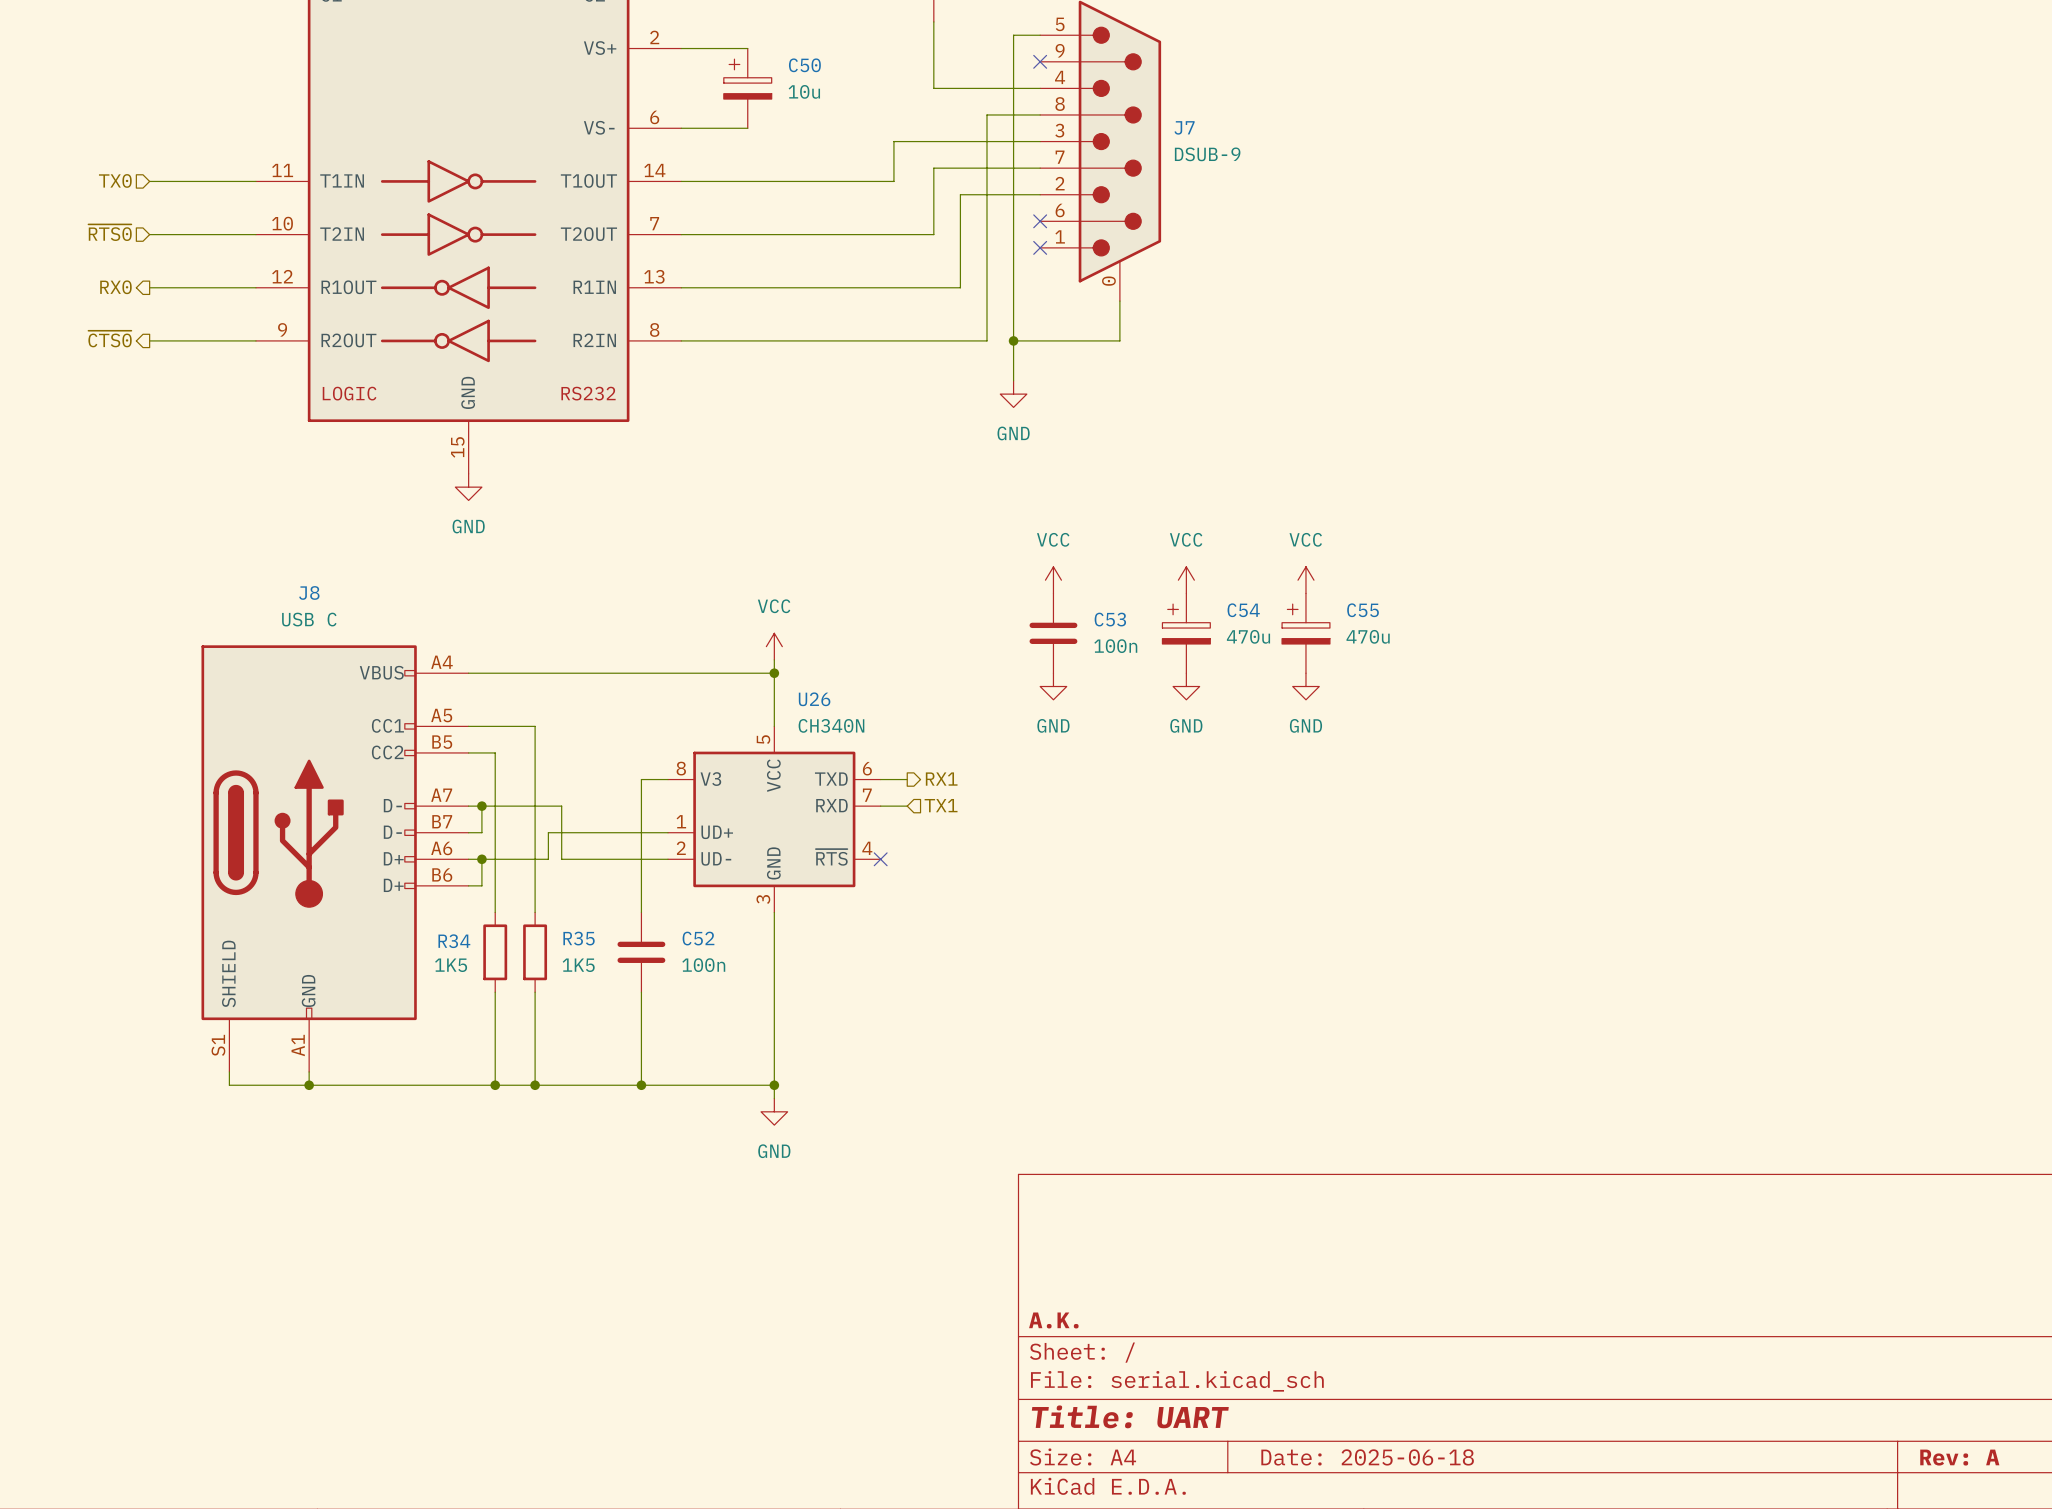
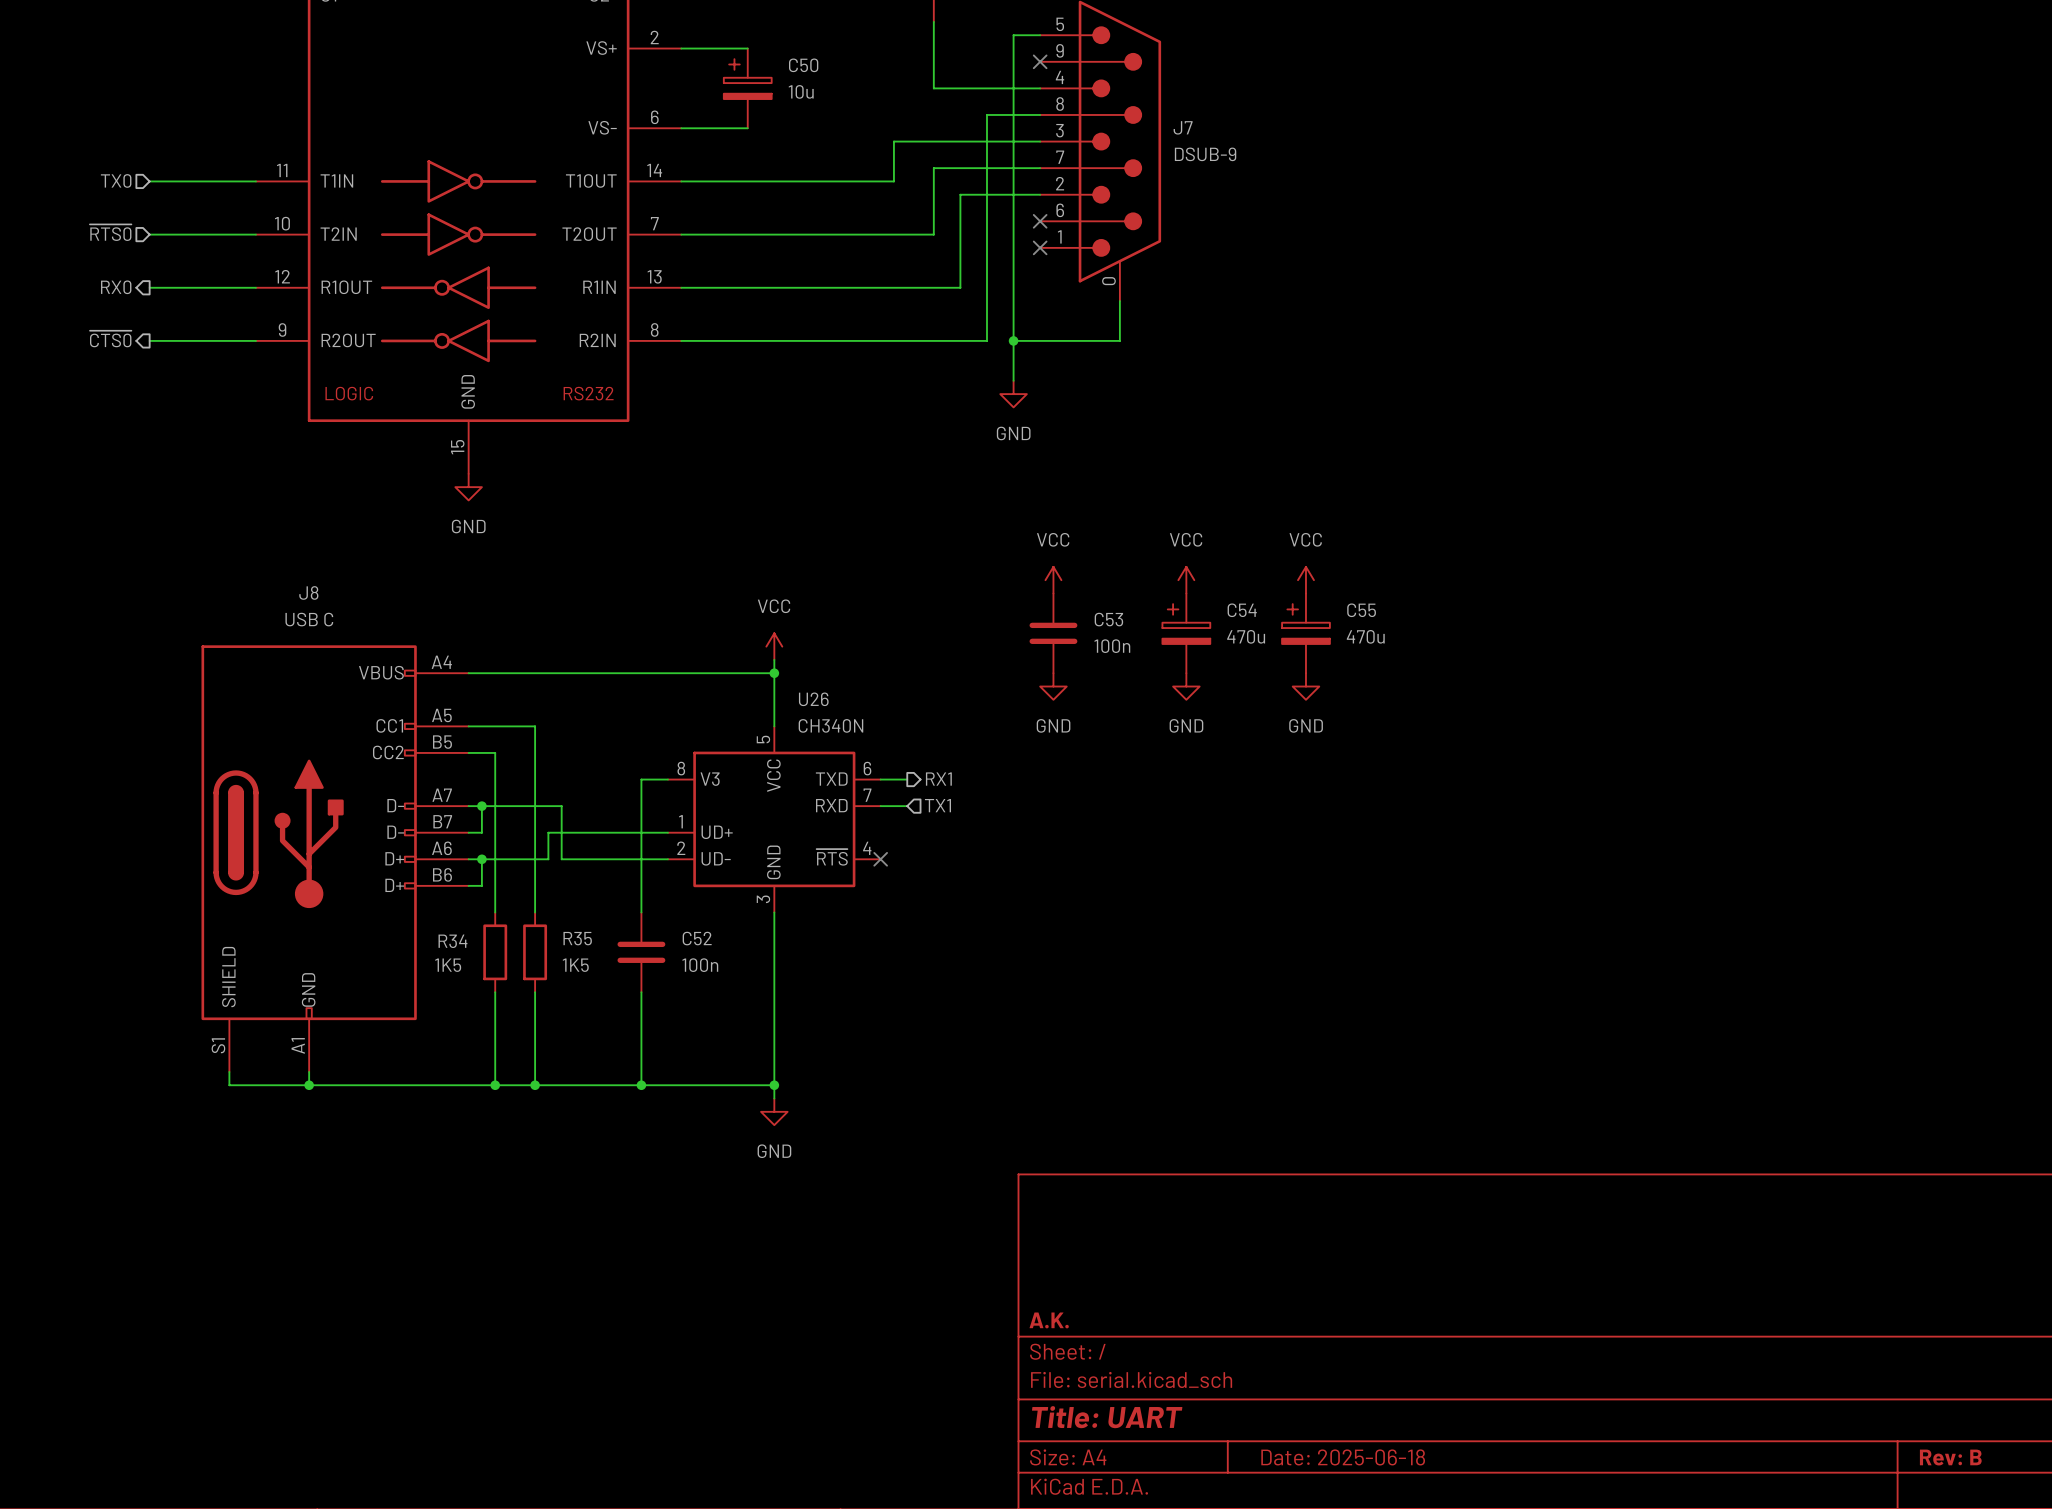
title block: Rev: A (1959, 1457) -> Rev: B (1950, 1457)

